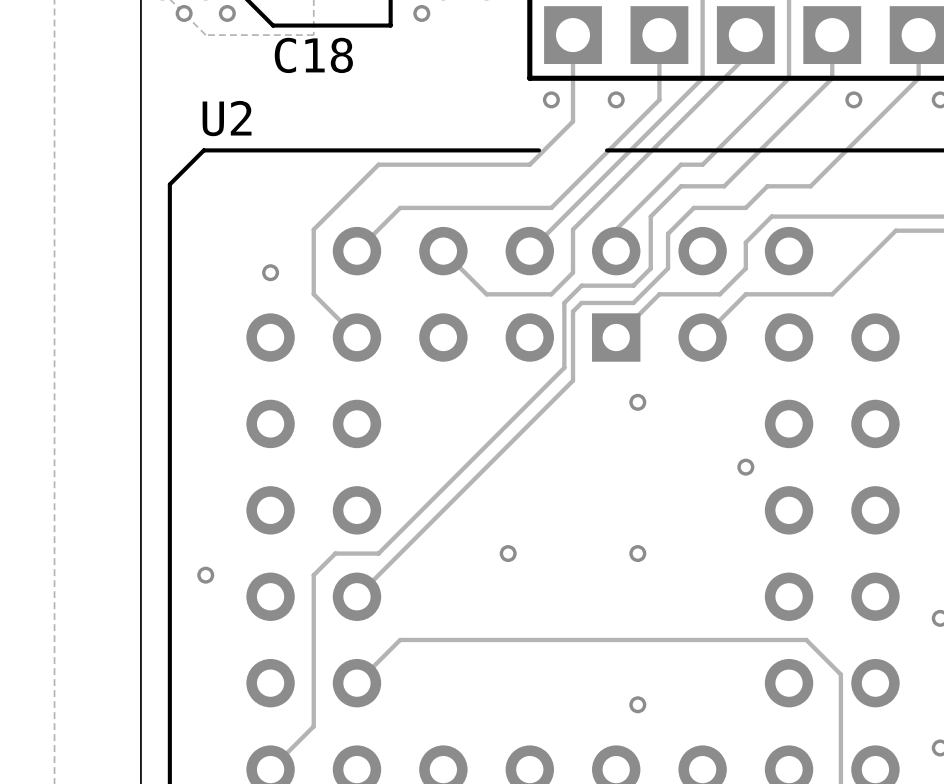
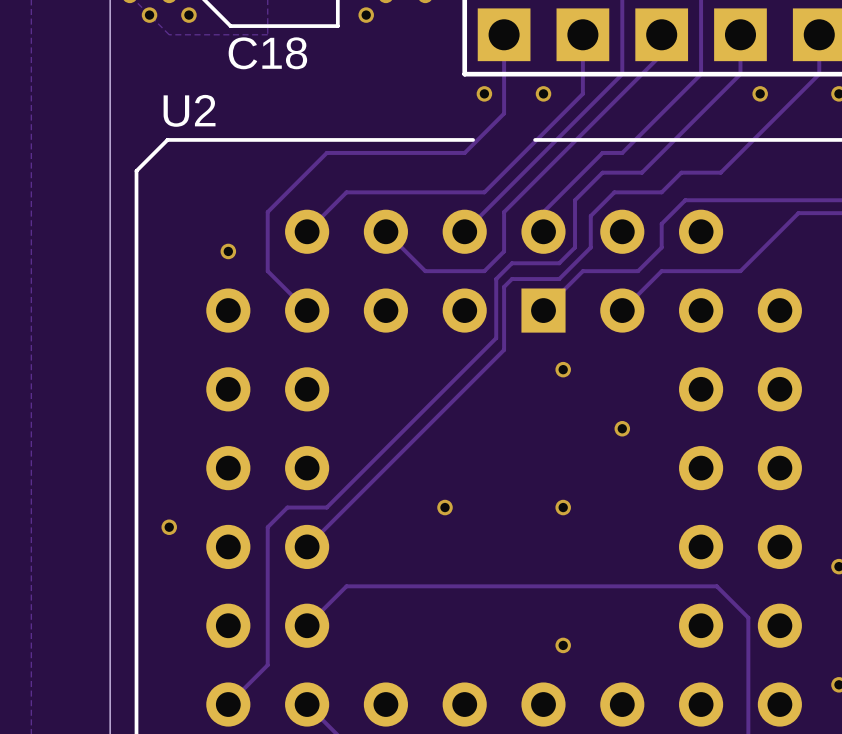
via position: (745, 467) -> (622, 428)

